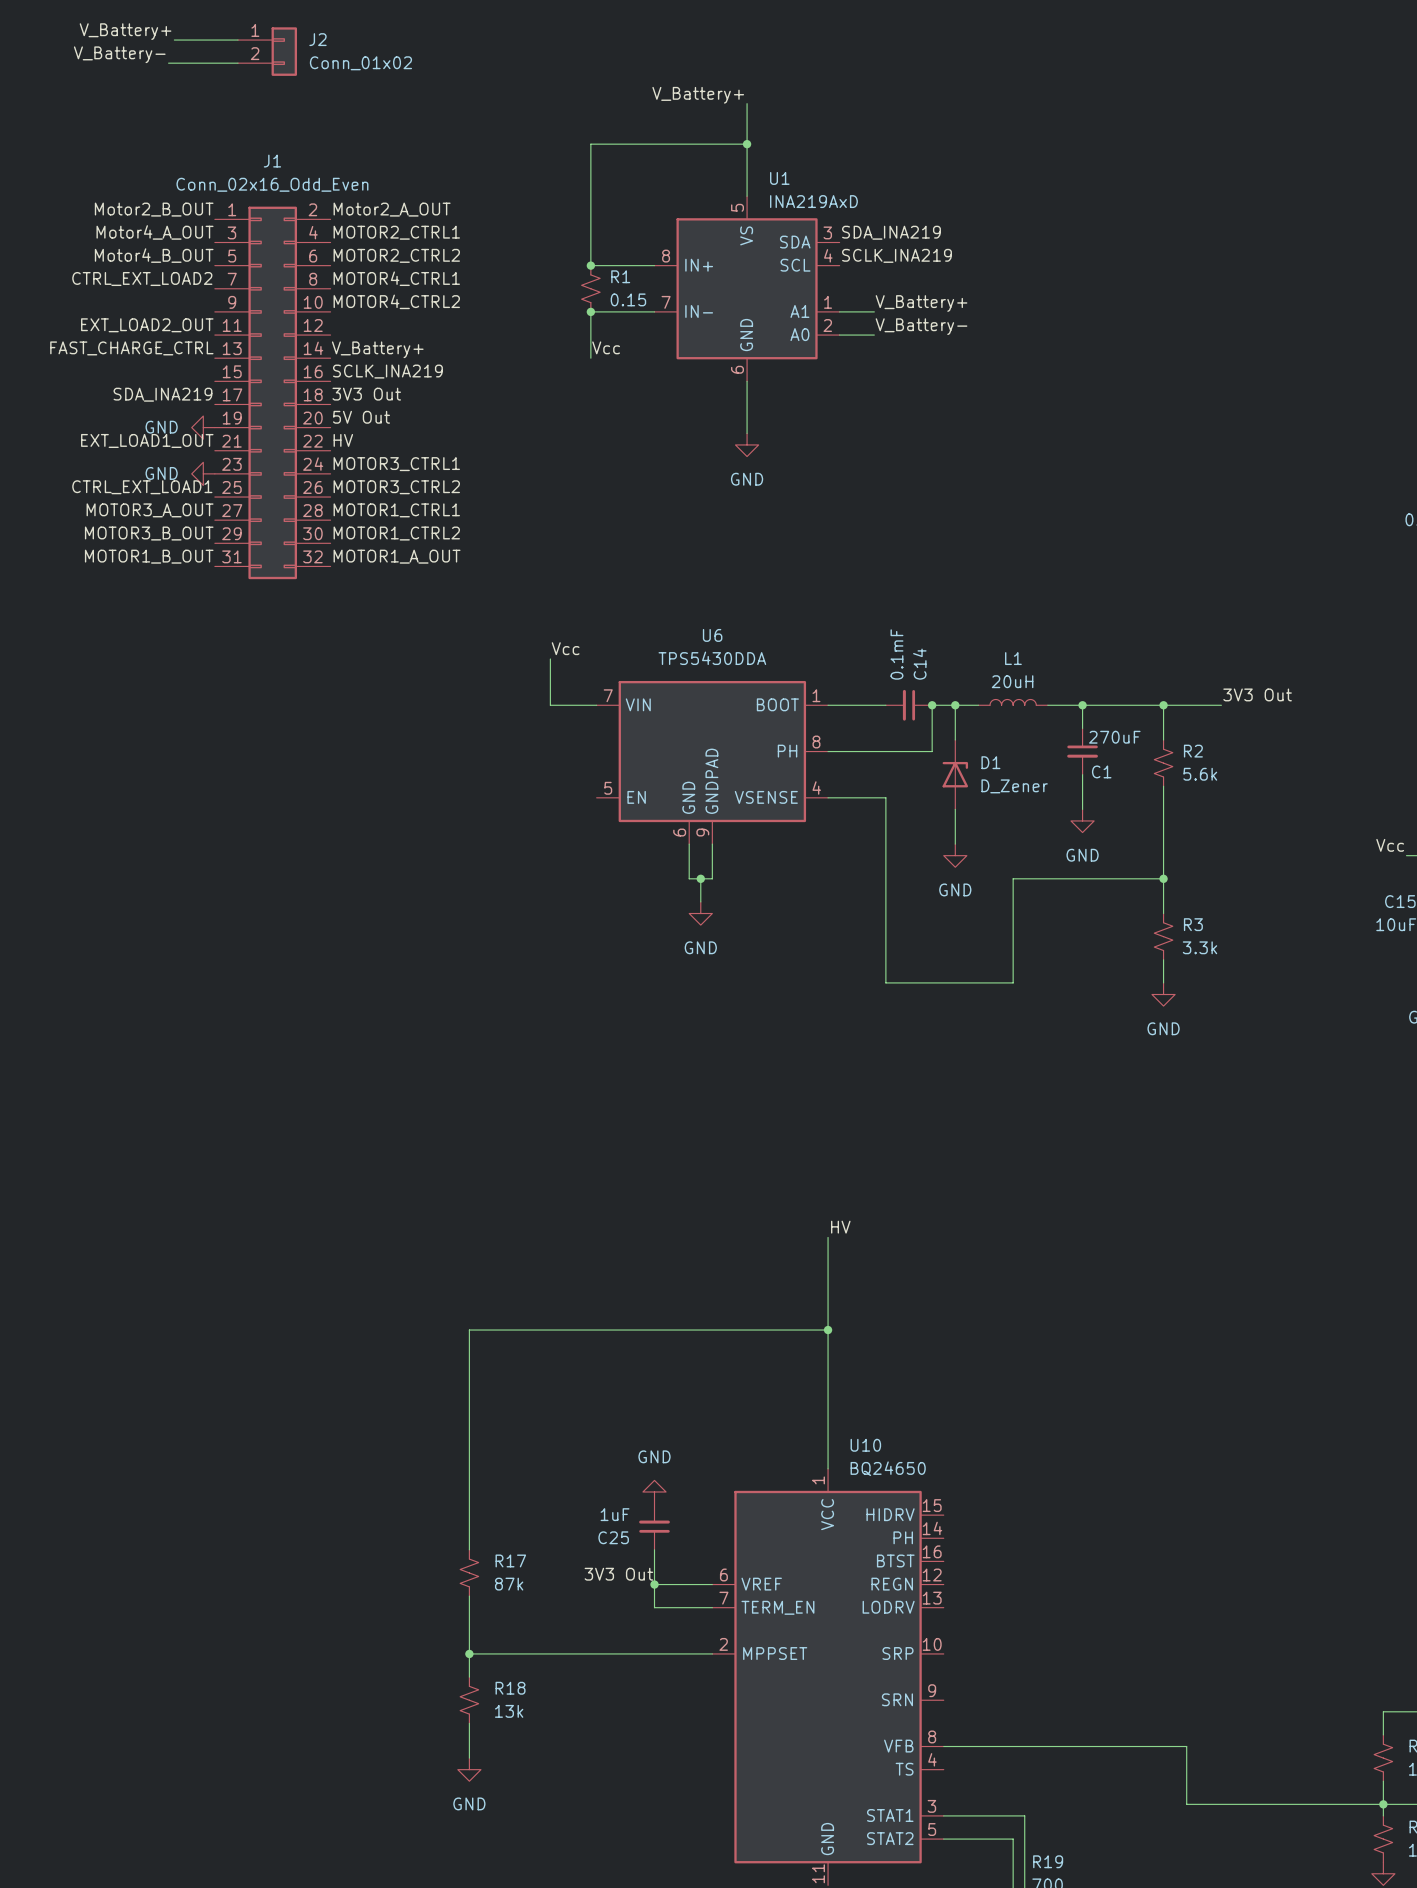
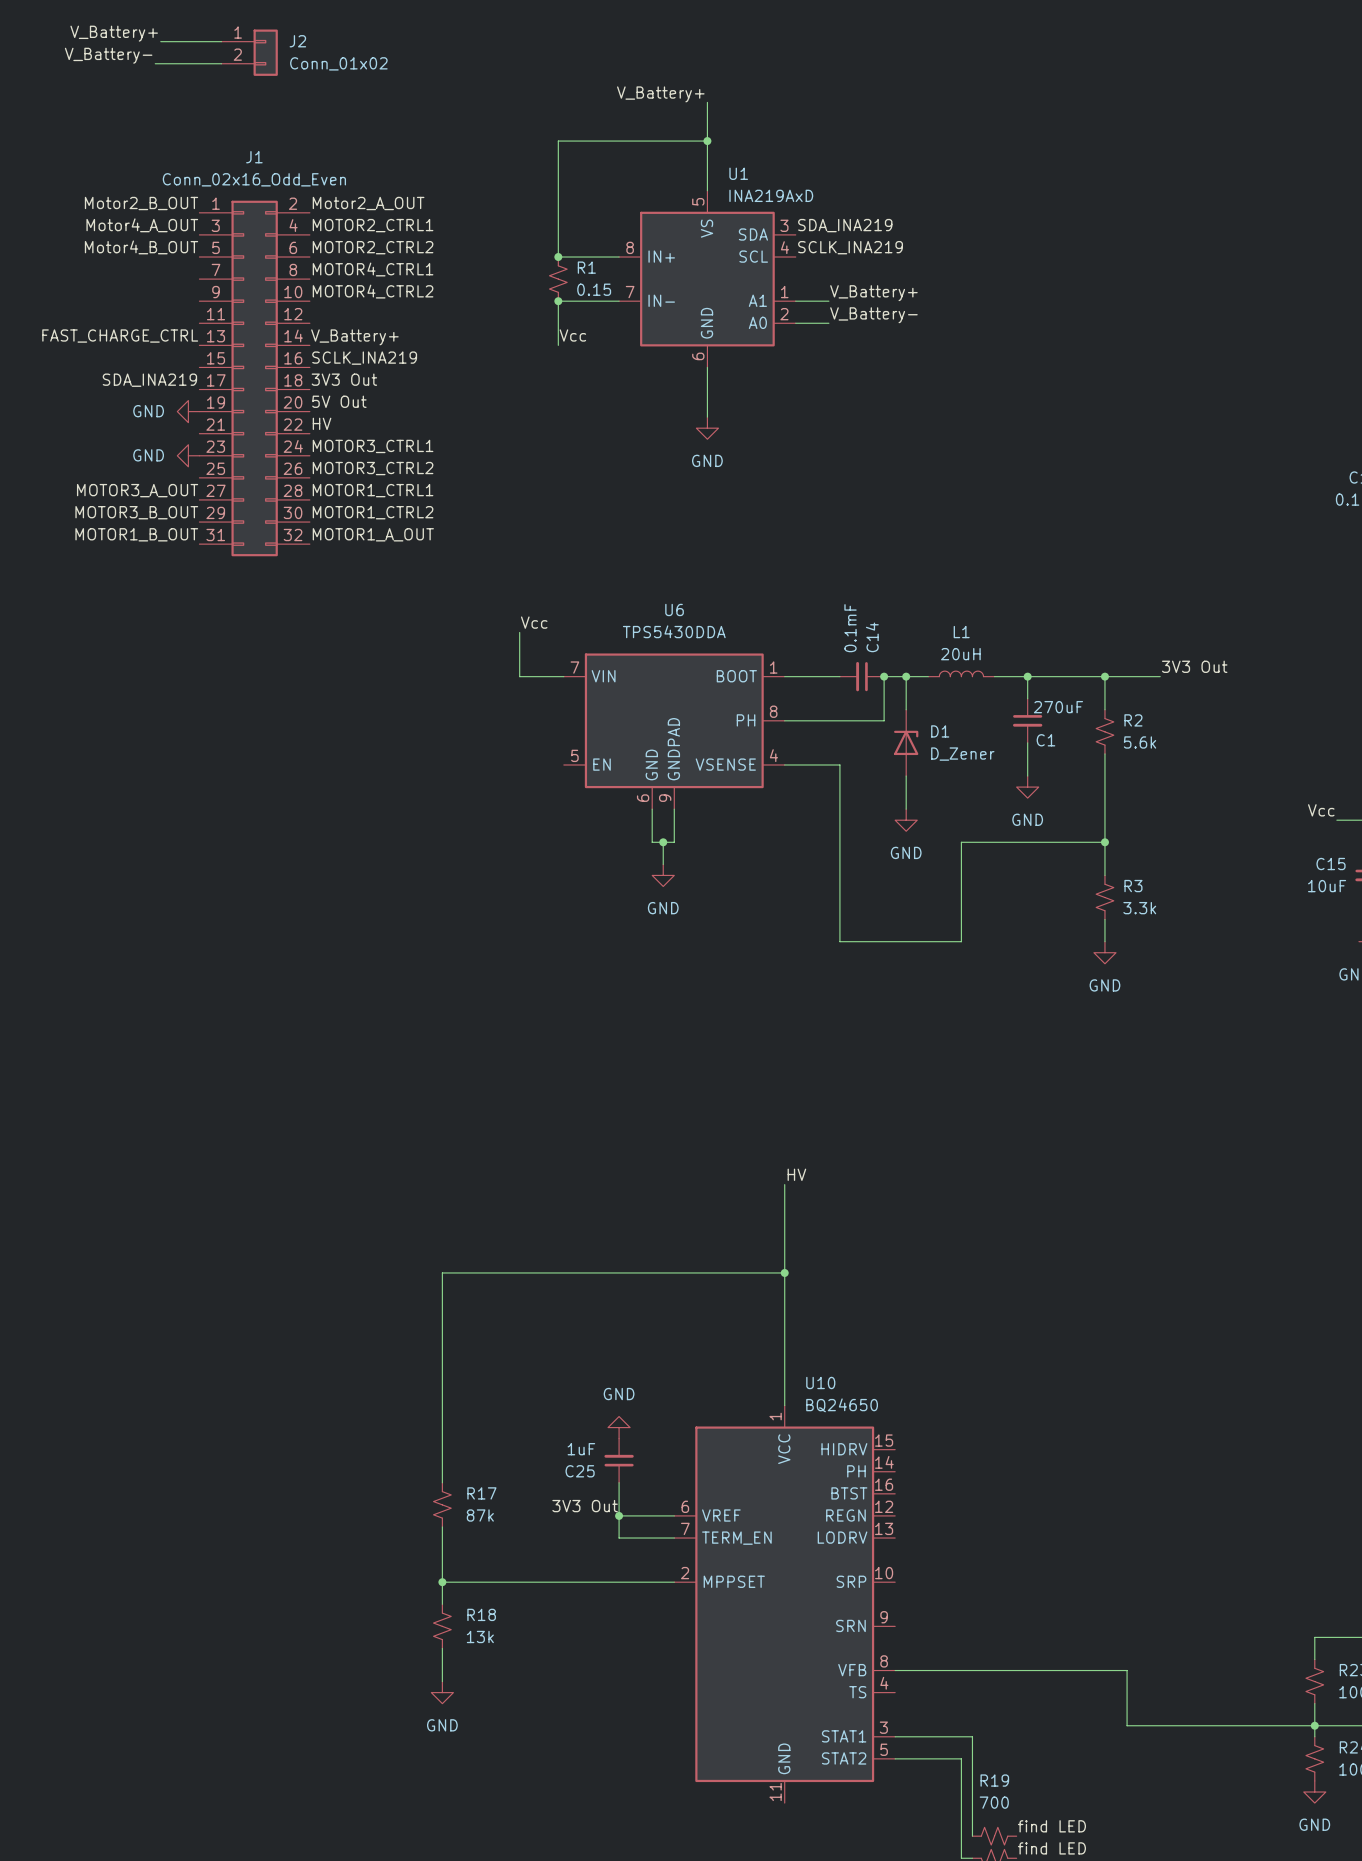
label: CTRL_EXT_LOAD2 (142, 279) -> none
label: EXT_LOAD2_OUT (147, 325) -> none
label: EXT_LOAD1_OUT (147, 440) -> none
label: CTRL_EXT_LOAD1 (142, 487) -> none

